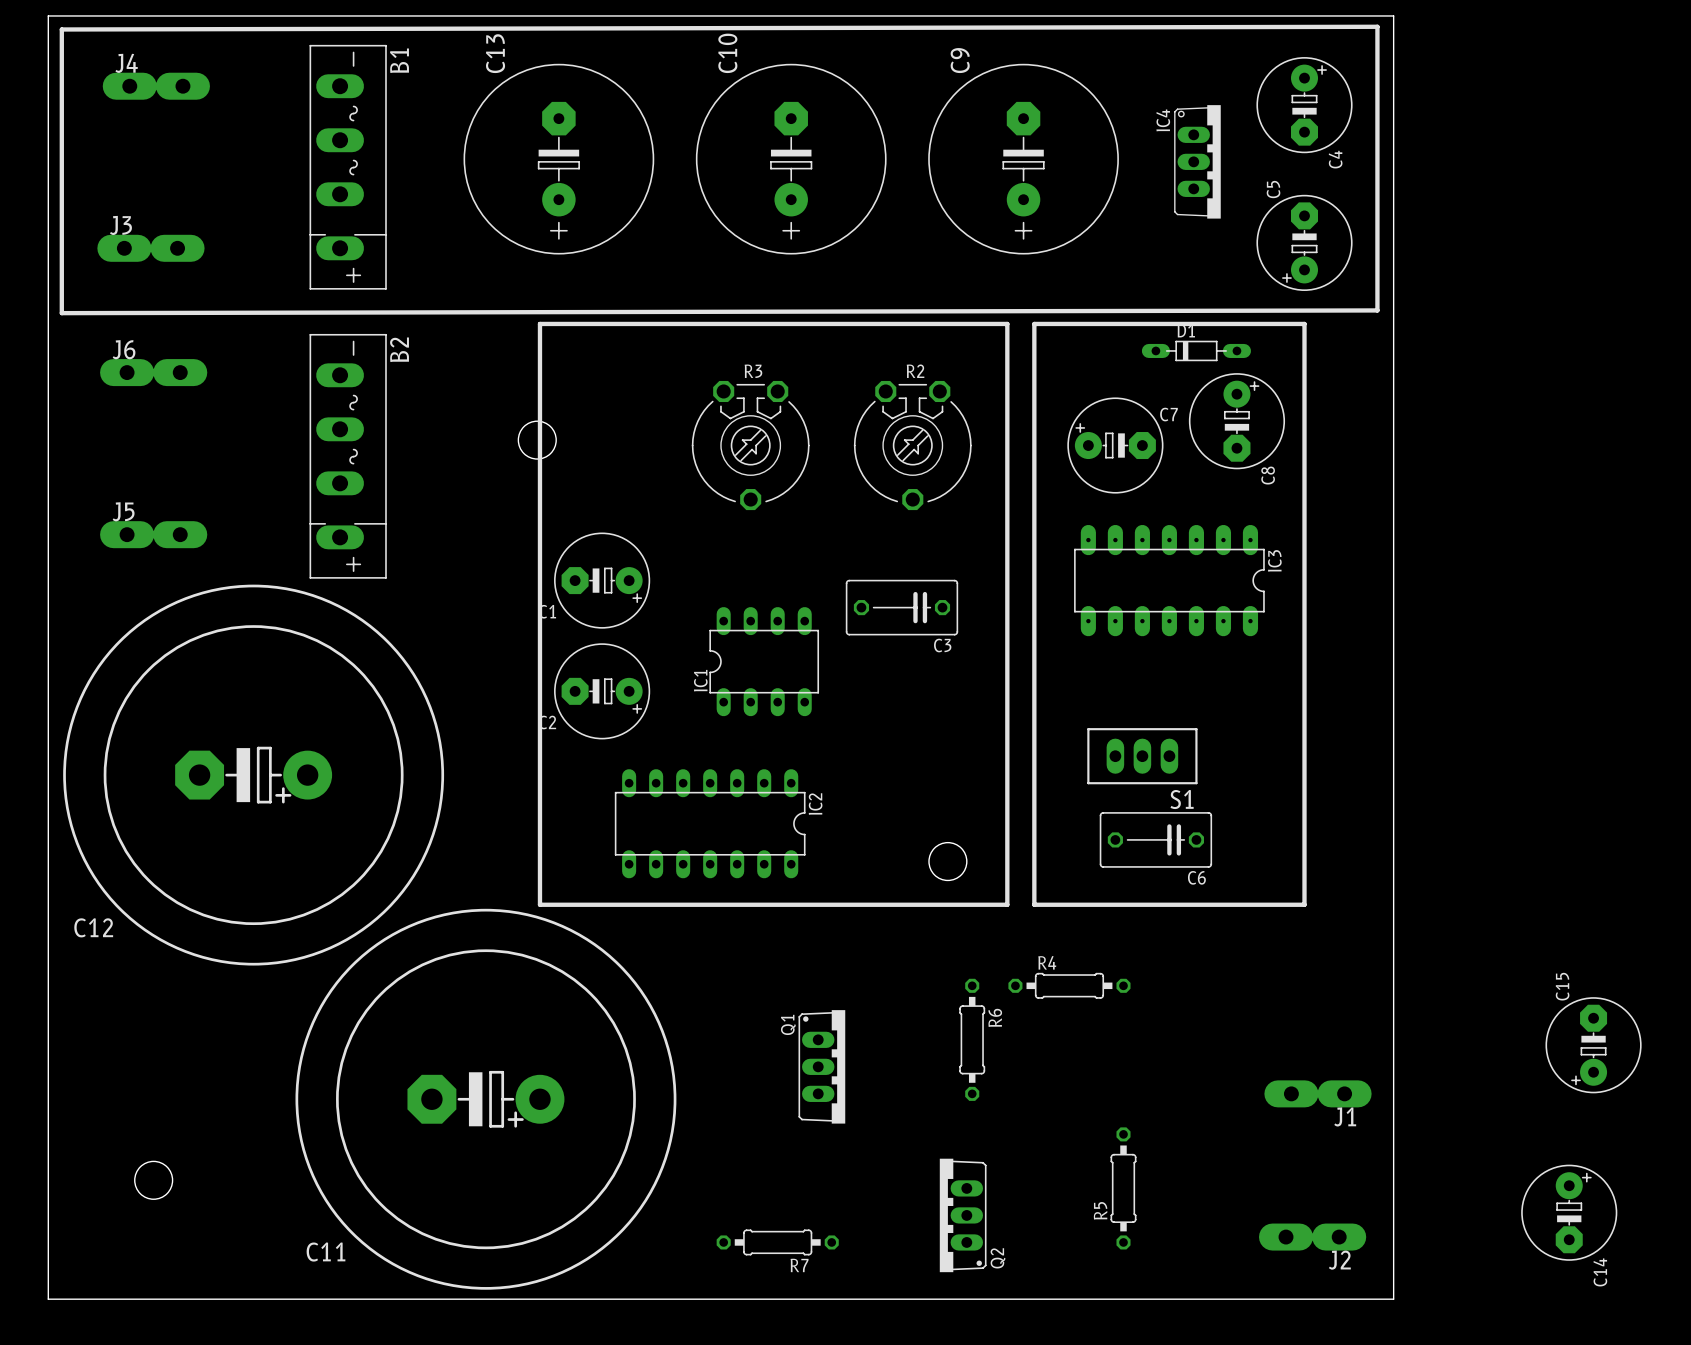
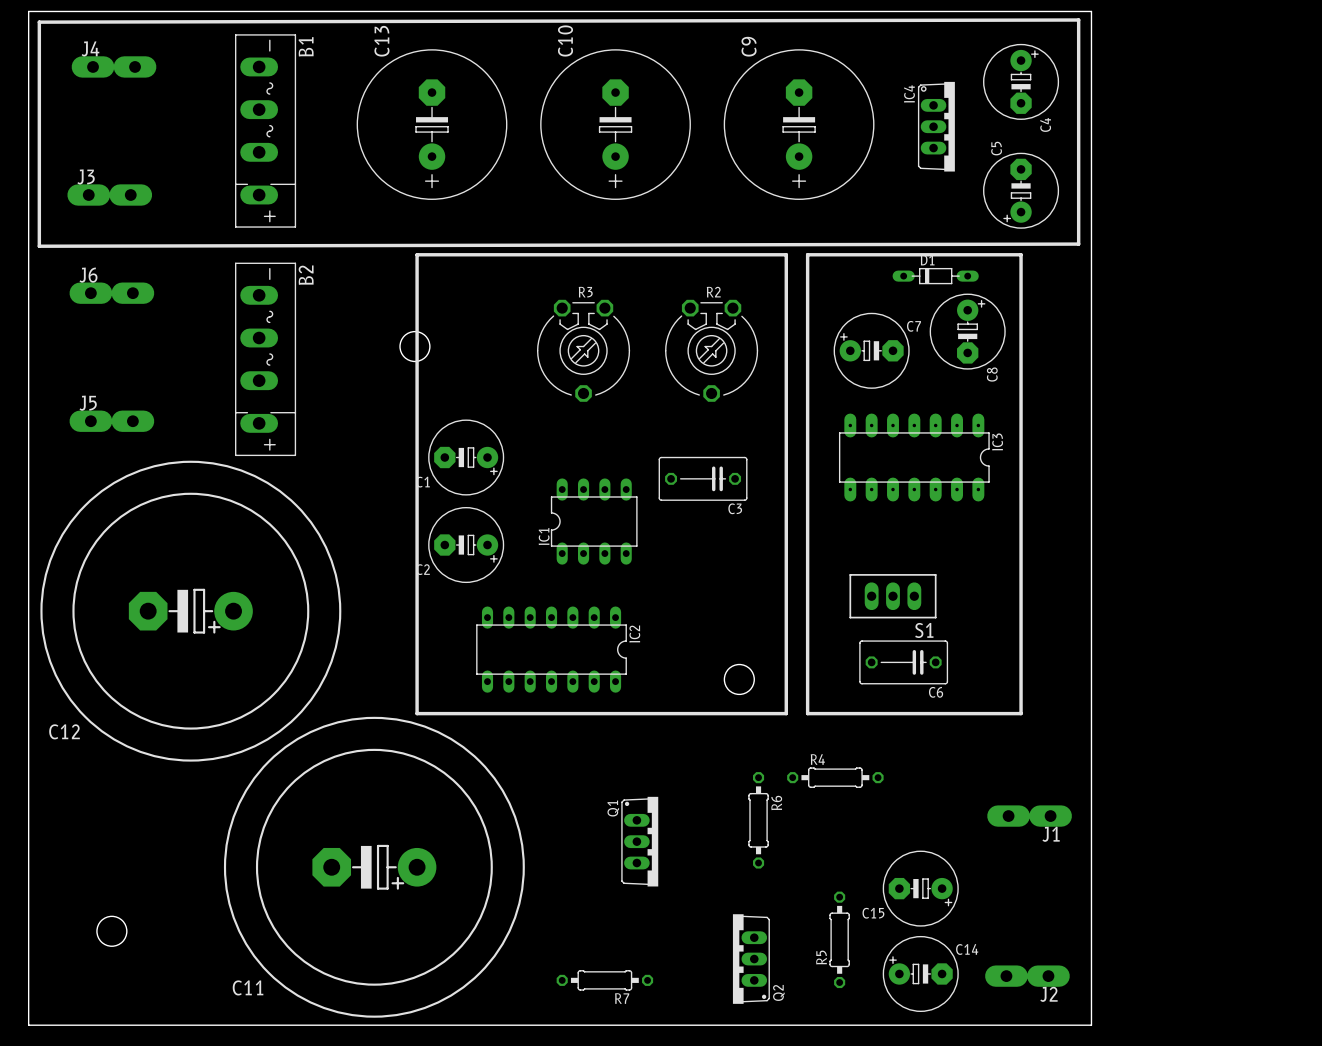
C15 rotation: 0° (1593, 1045) -> 90° counterclockwise (920, 888)
C15 position: (1593, 1045) -> (920, 888)
J1 position: (1318, 1093) -> (1029, 816)
R5 position: (1123, 1188) -> (839, 939)
C14 rotation: 0° (1569, 1212) -> 90° counterclockwise (920, 973)
C14 position: (1569, 1212) -> (920, 973)

